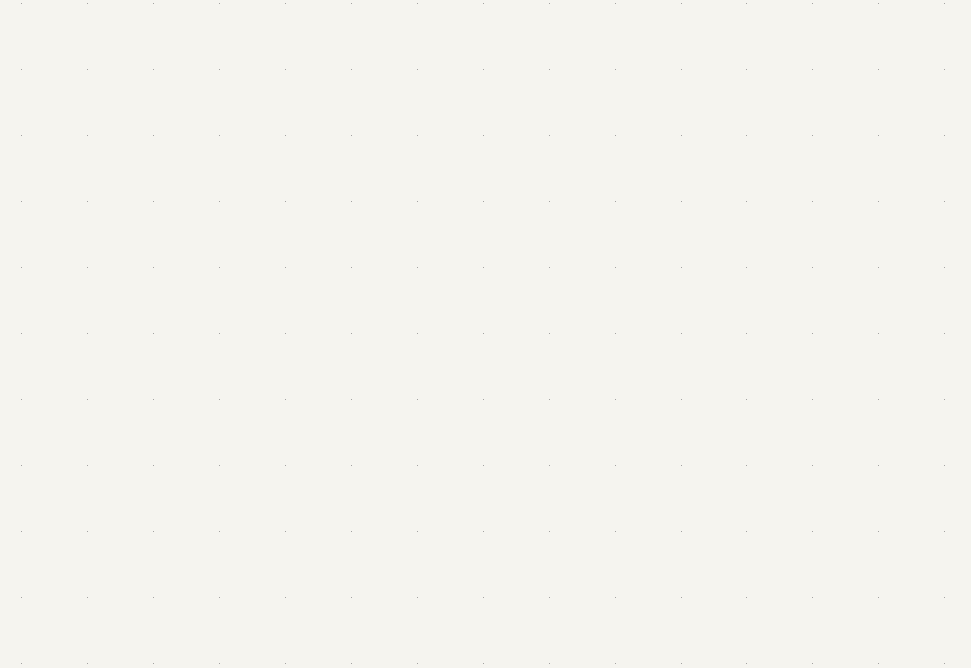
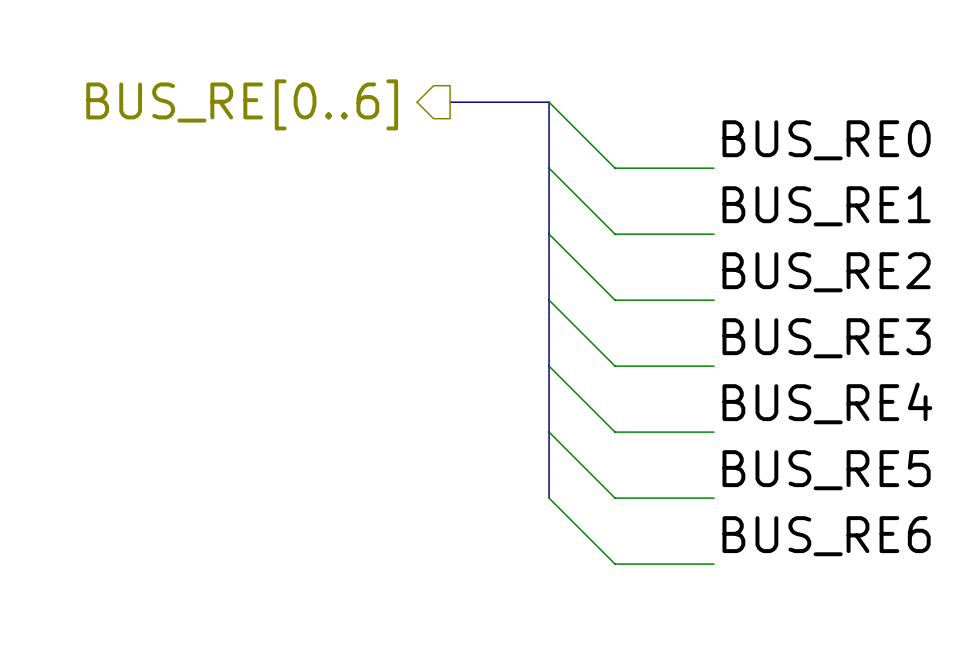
hierarchical label: none -> BUS_RE[0..6] (242, 104)
bus: none -> (450, 102) (549, 102) (549, 498)
wire: none -> (549, 102) (615, 168) (714, 168)
label: none -> BUS_RE0 (826, 140)
wire: none -> (549, 168) (615, 234) (714, 234)
label: none -> BUS_RE1 (826, 206)
wire: none -> (549, 234) (615, 300) (714, 300)
label: none -> BUS_RE2 (826, 272)
wire: none -> (549, 300) (615, 366) (714, 366)
label: none -> BUS_RE3 (826, 338)
wire: none -> (549, 366) (615, 432) (714, 432)
label: none -> BUS_RE4 (827, 403)
wire: none -> (549, 432) (615, 498) (714, 498)
label: none -> BUS_RE5 (826, 470)
wire: none -> (549, 498) (615, 564) (714, 564)
label: none -> BUS_RE6 (826, 536)

